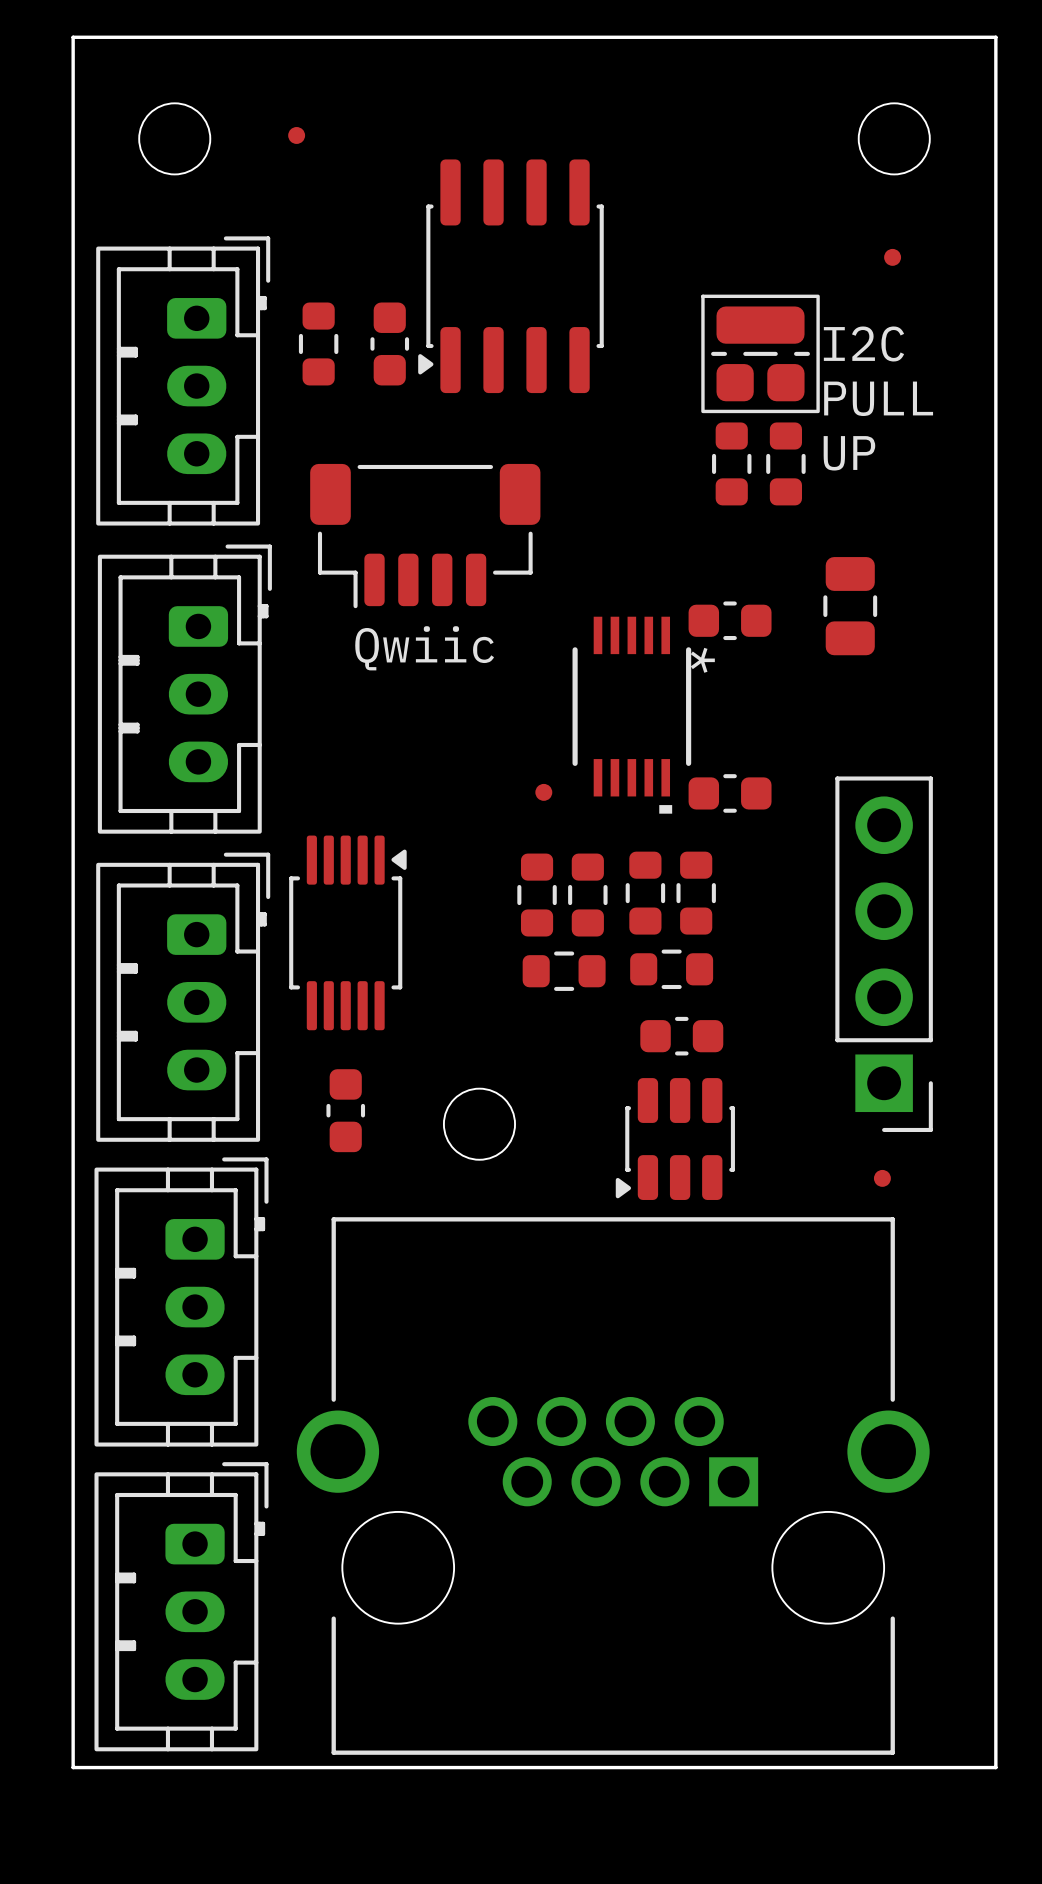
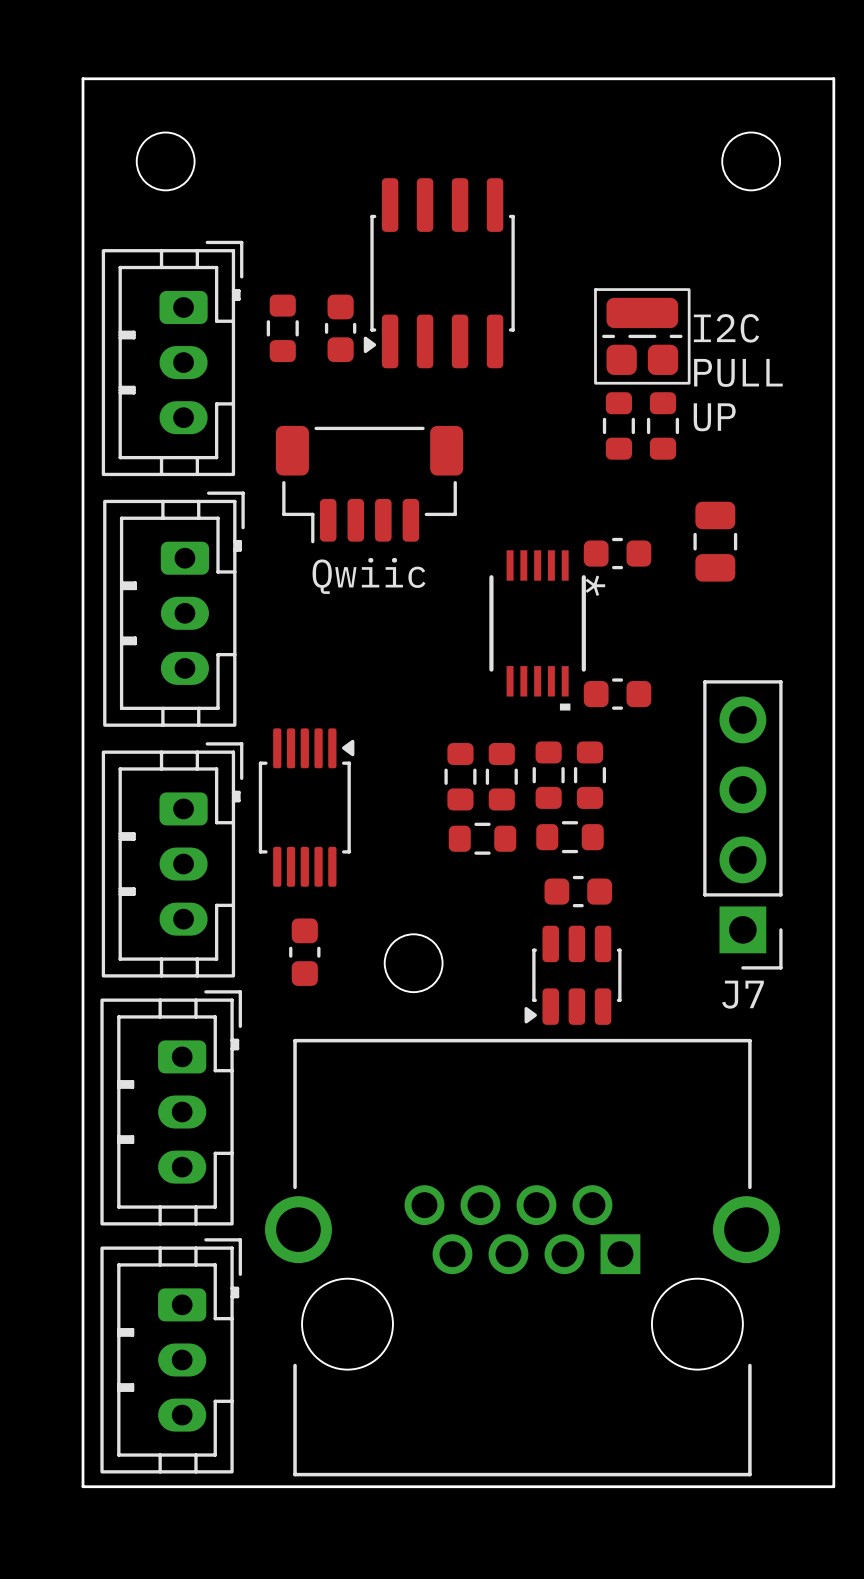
part: (296, 135) -> none
part: (892, 257) -> none
part: (543, 792) -> none
J7 name: none -> J7 (742, 994)
part: (882, 1178) -> none

